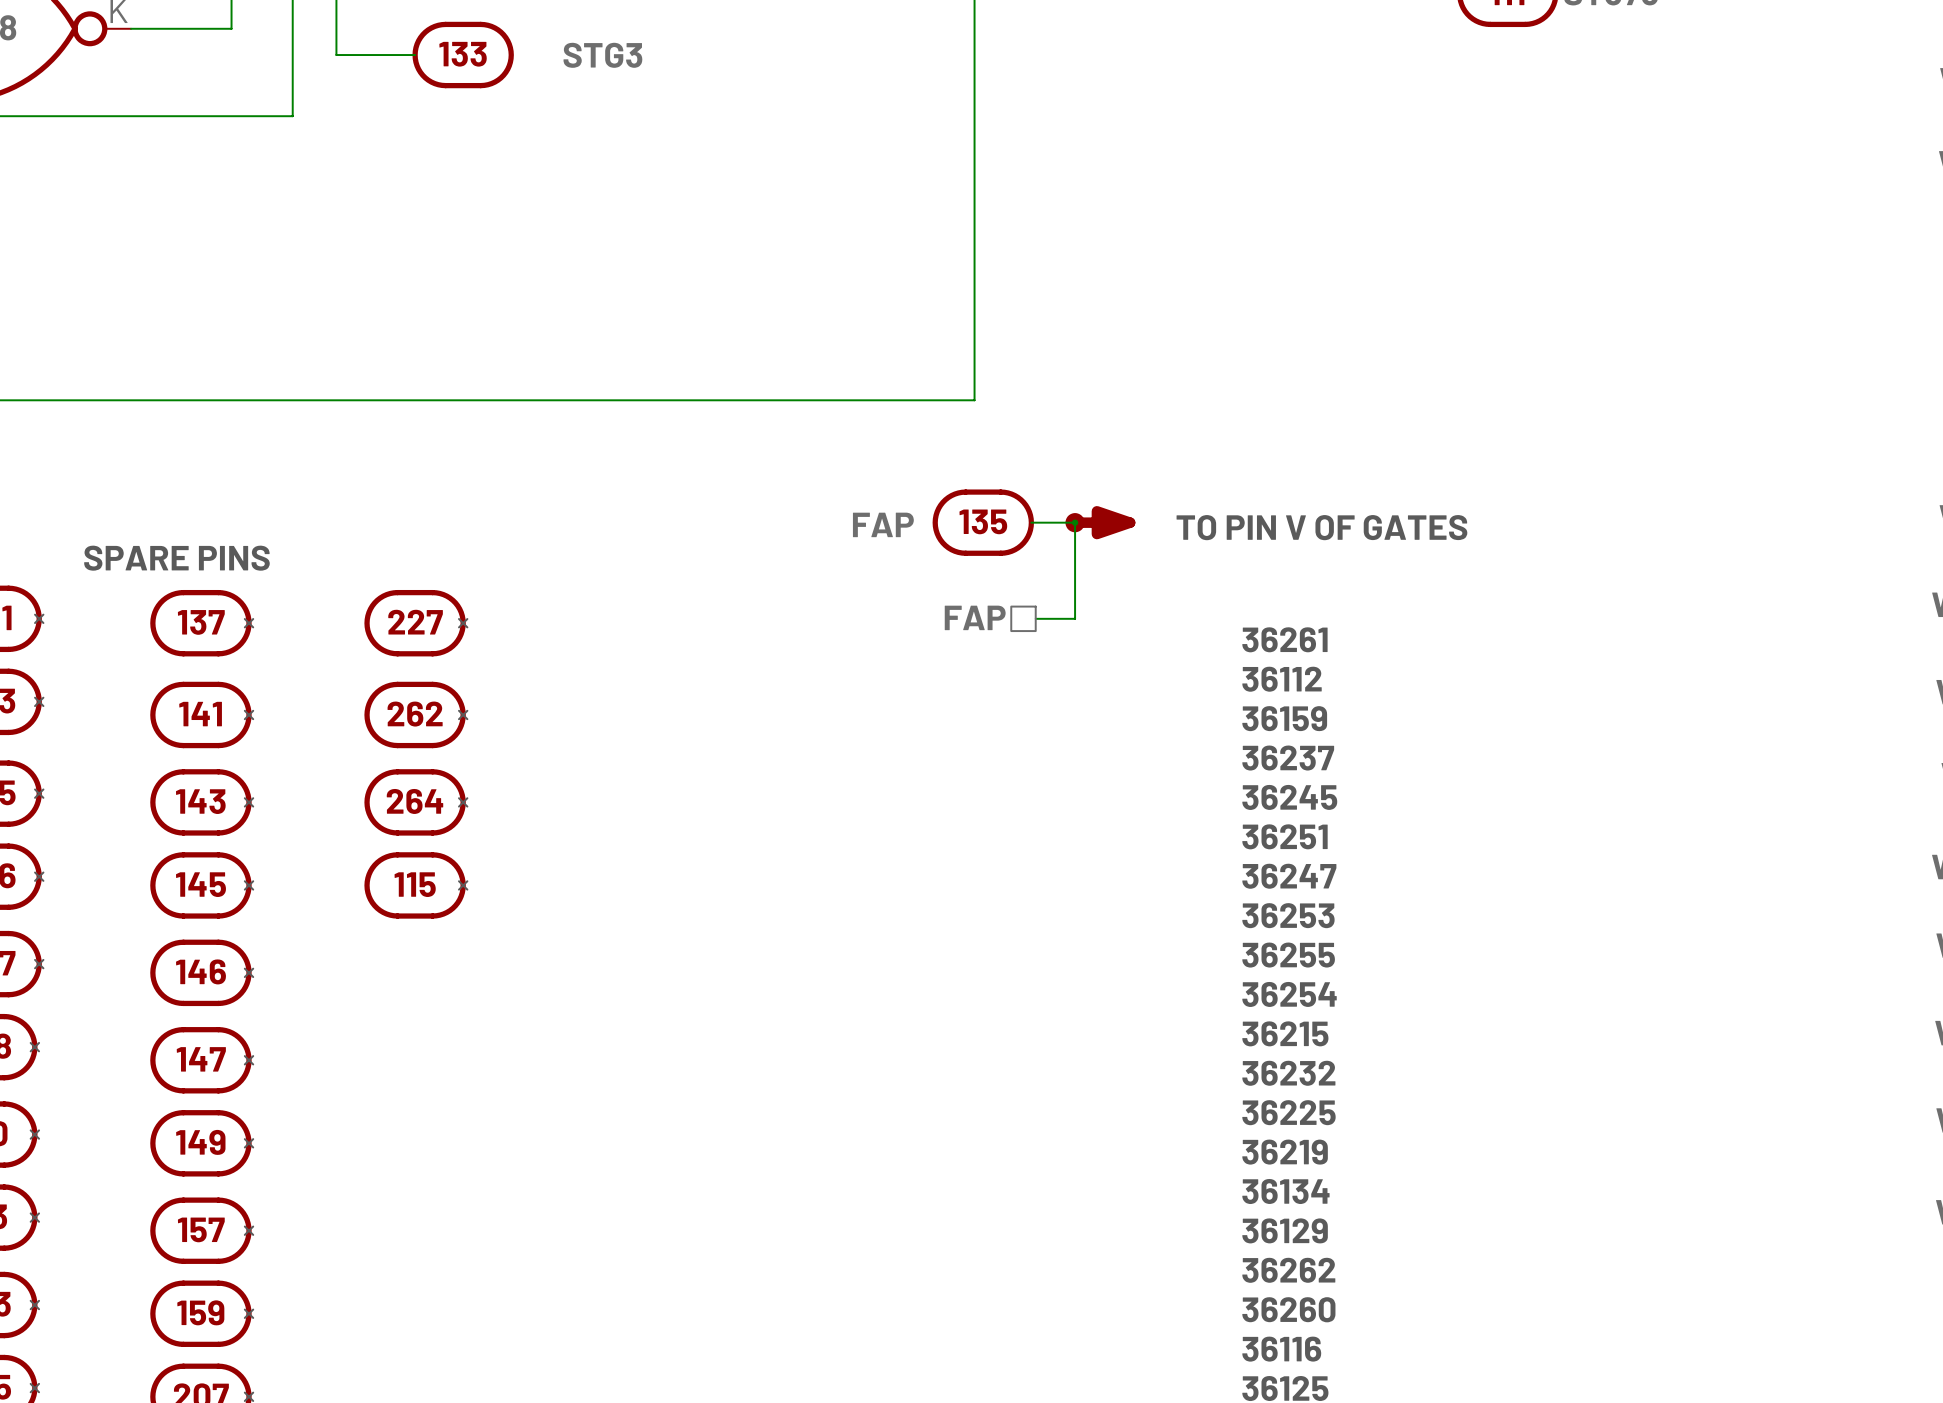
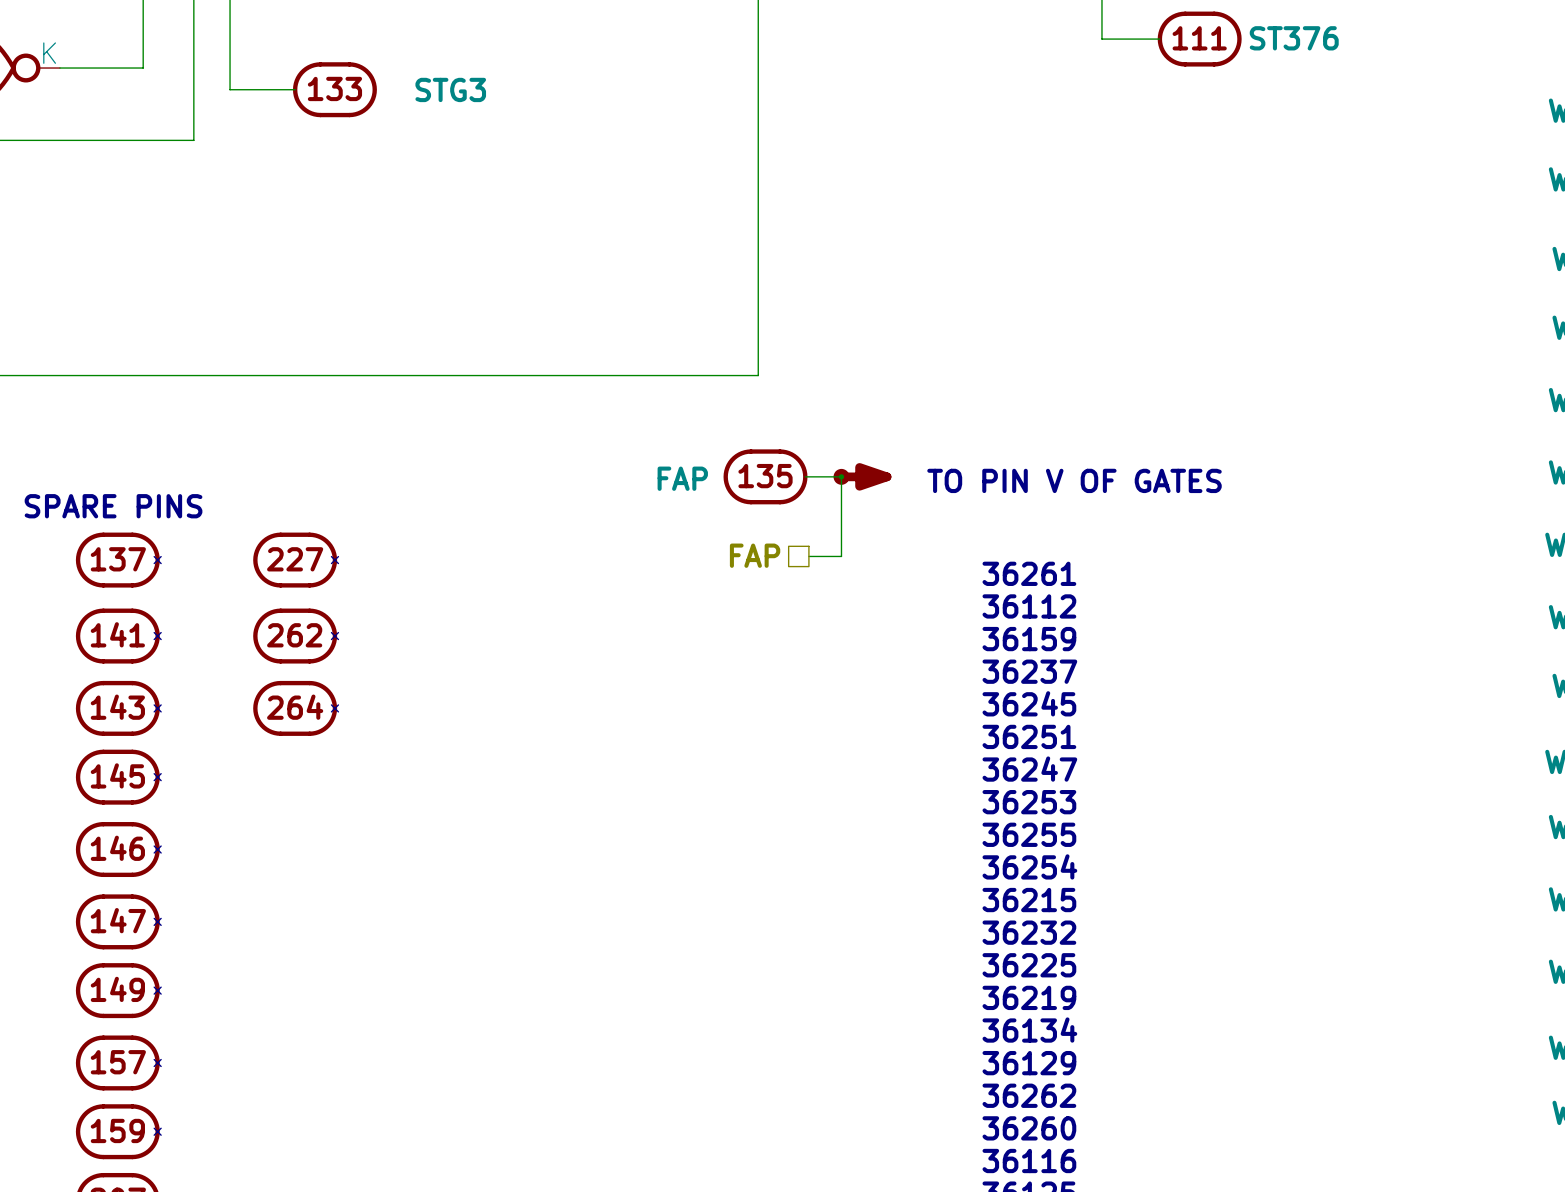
part: (415, 885) -> none
no-connect mark: (463, 885) -> none

